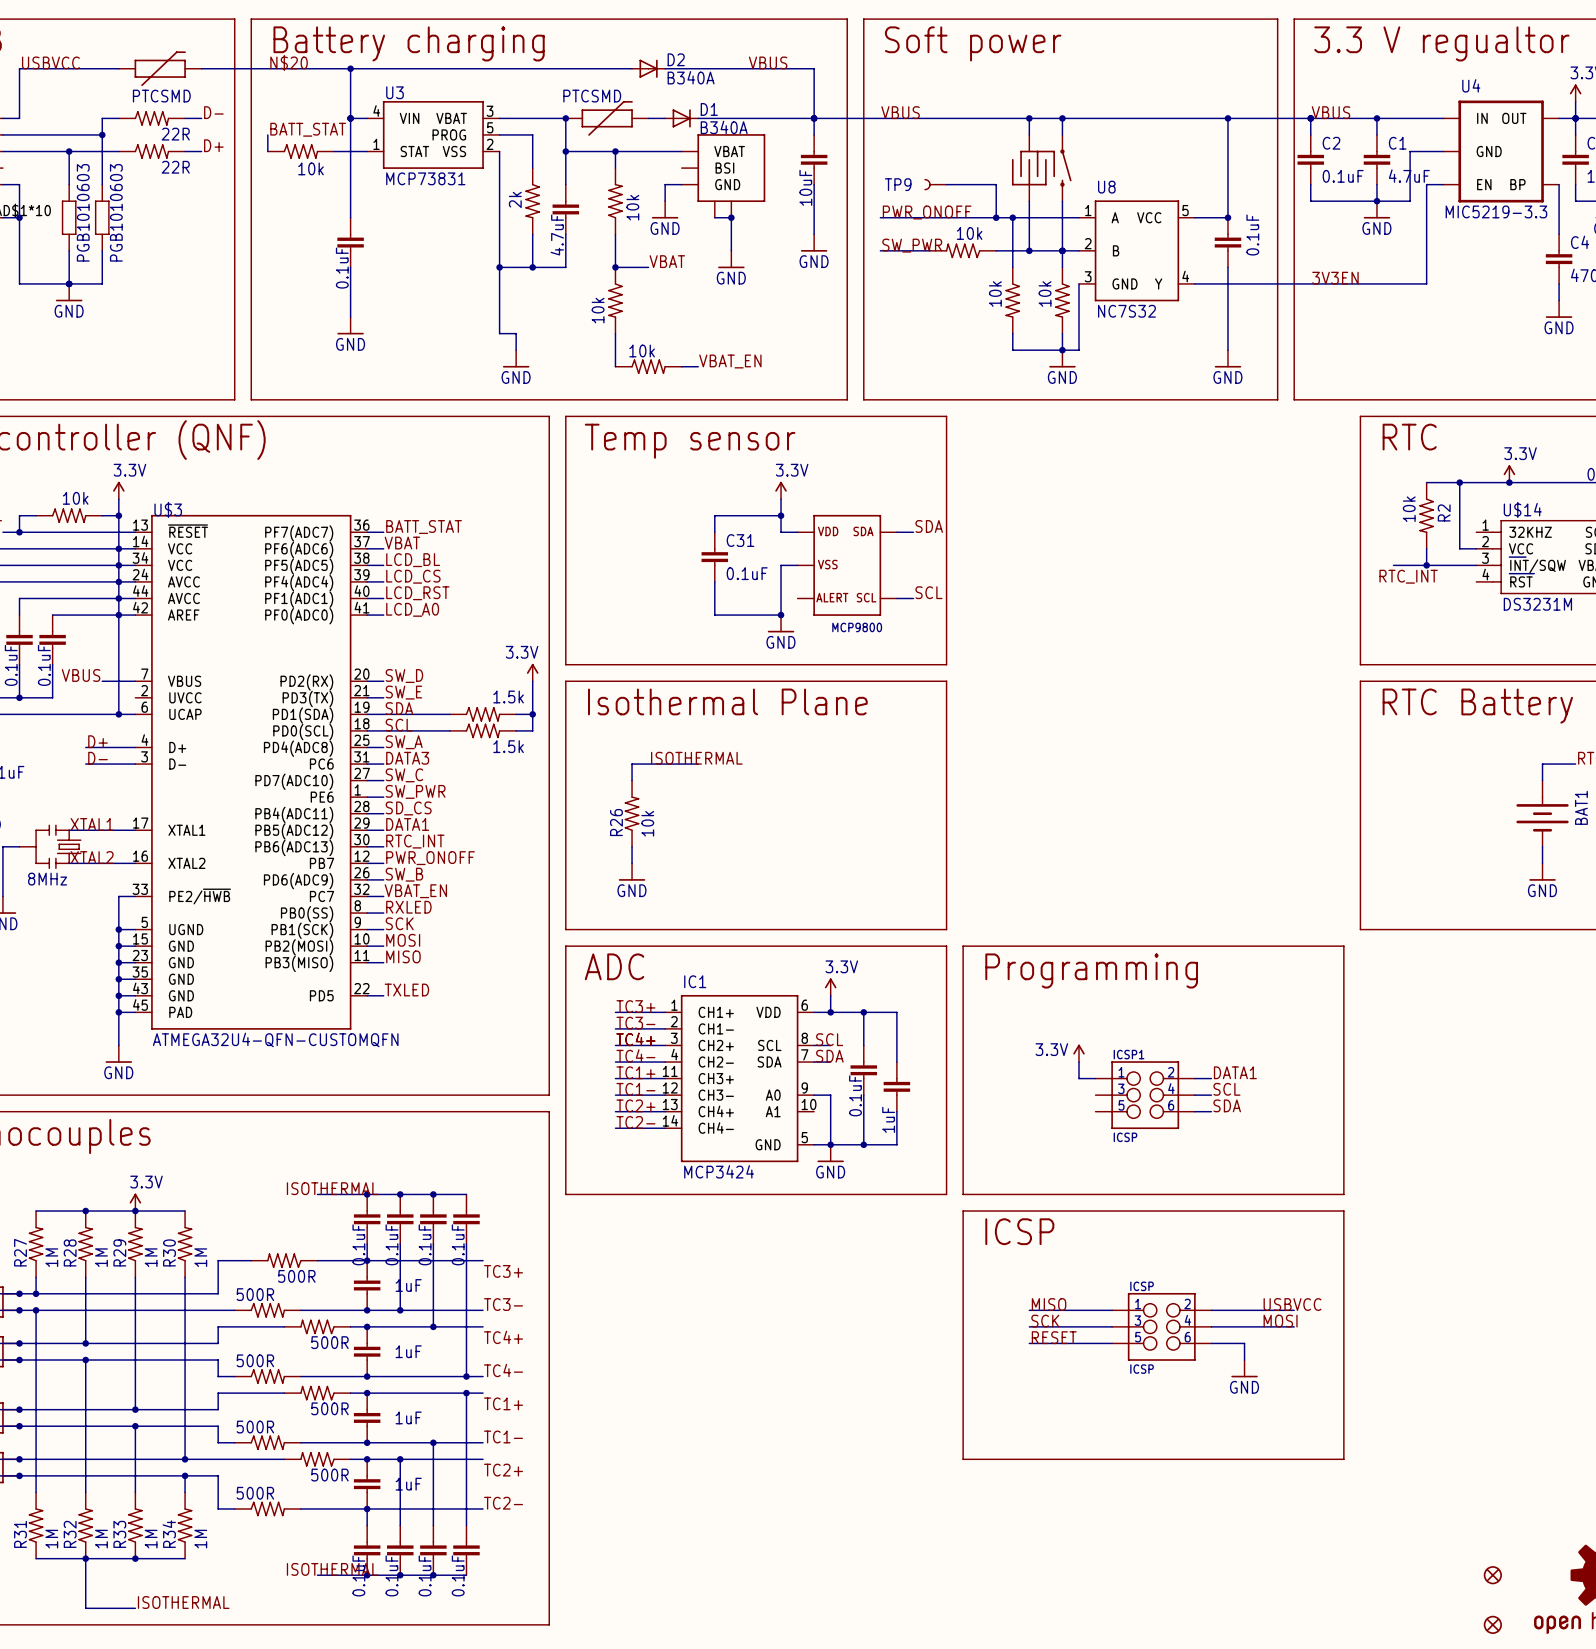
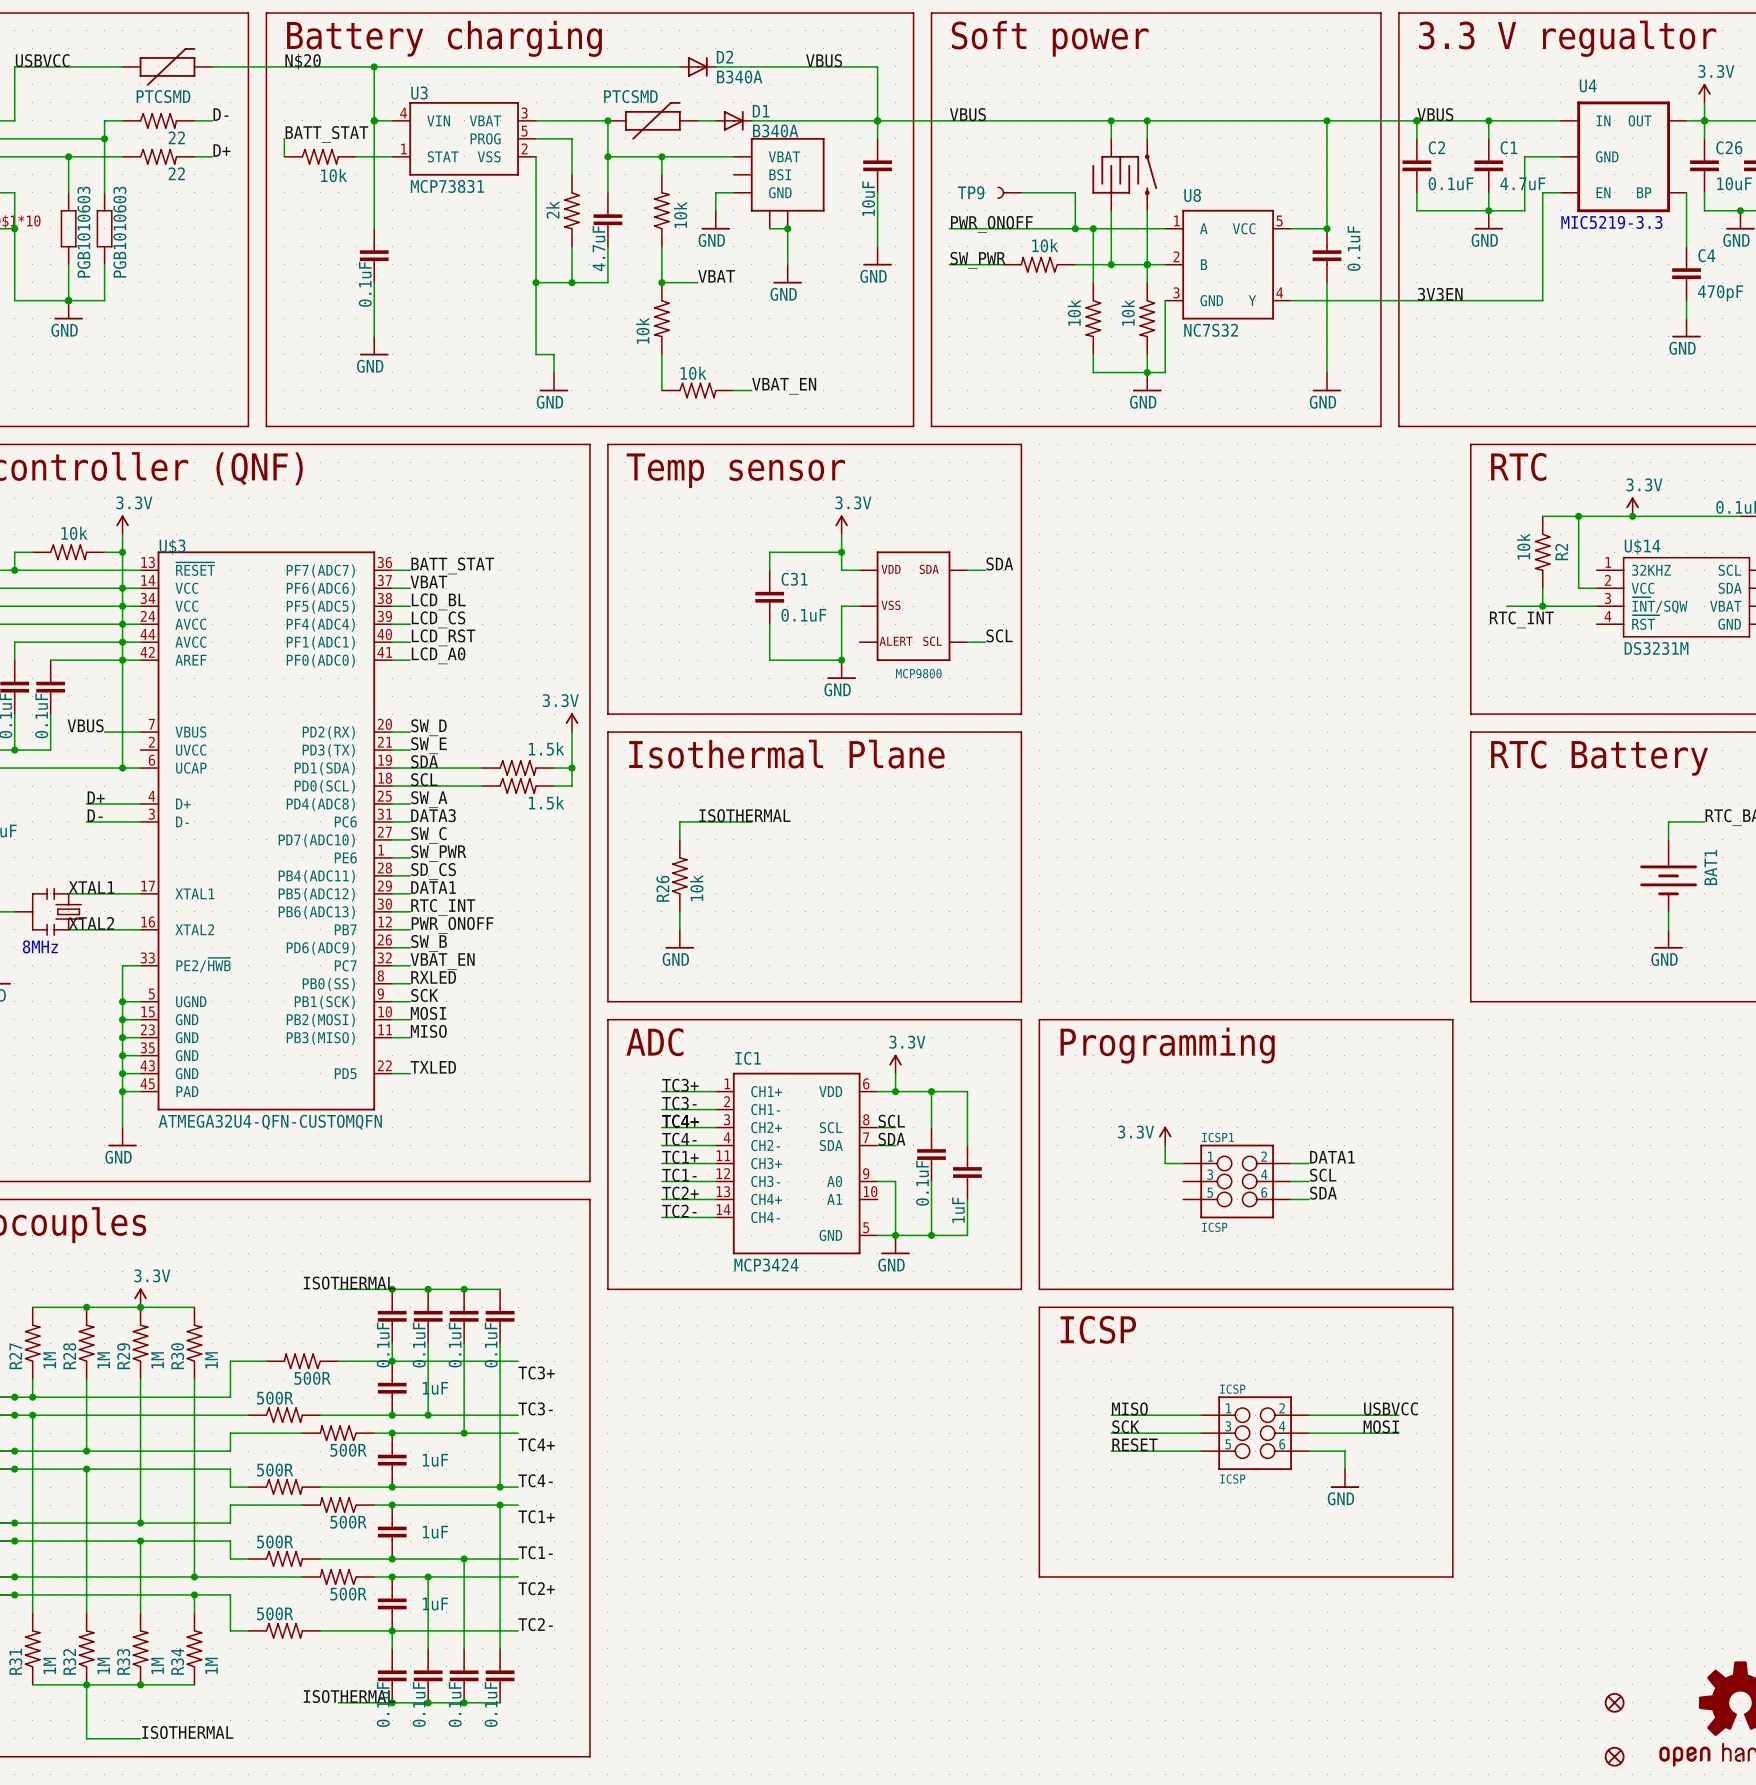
part value: 22R (175, 134) -> 22 (176, 137)
part value: 22R (175, 167) -> 22 (176, 173)

